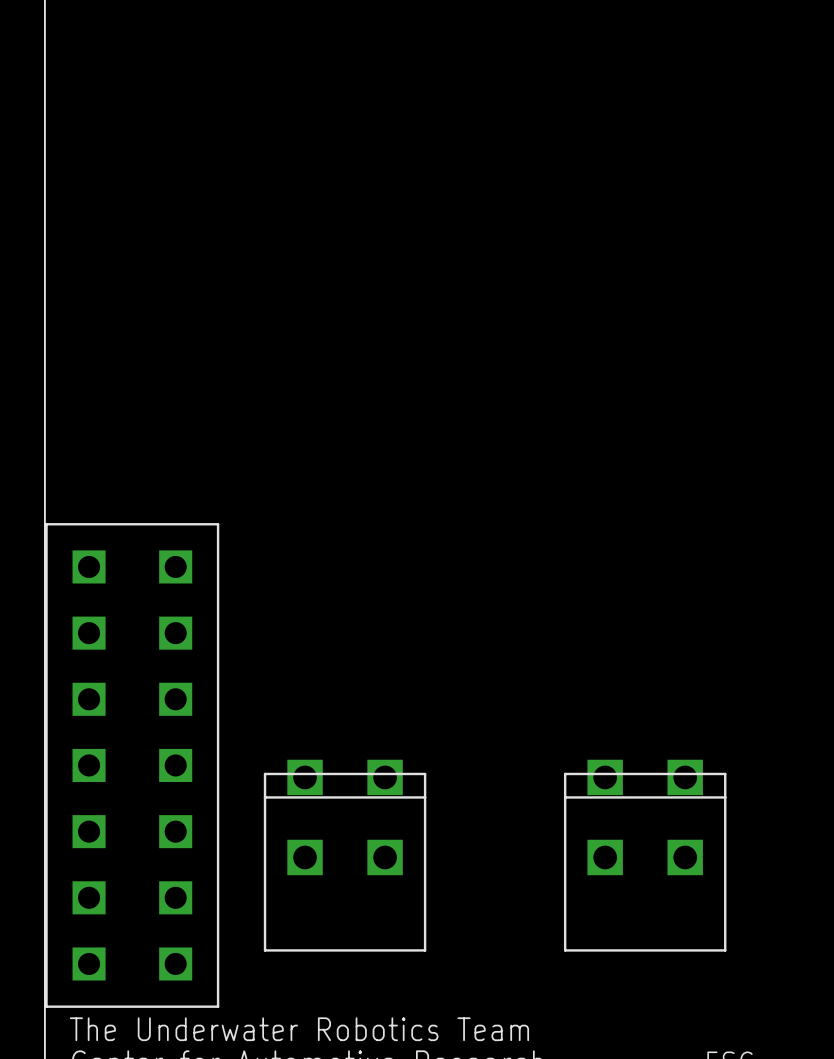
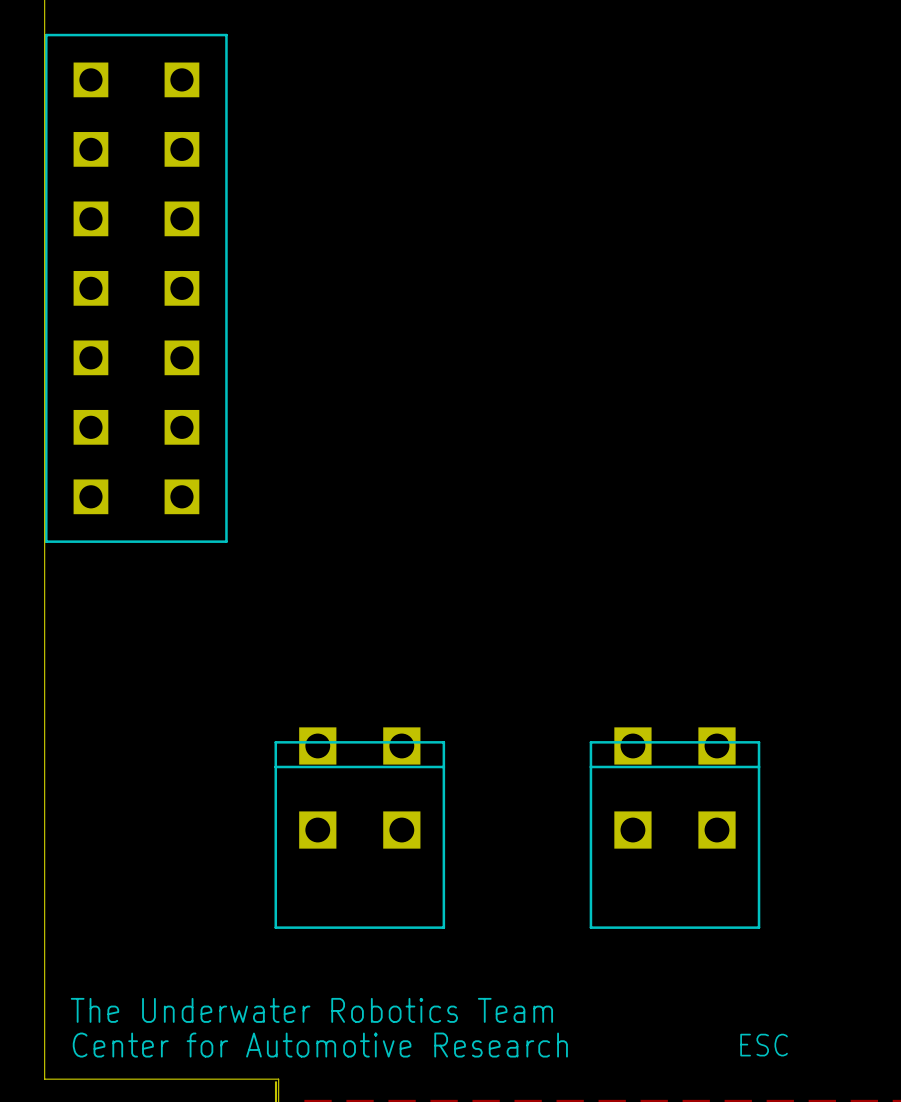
part: none -> (136, 288)
part: (132, 765) -> none

